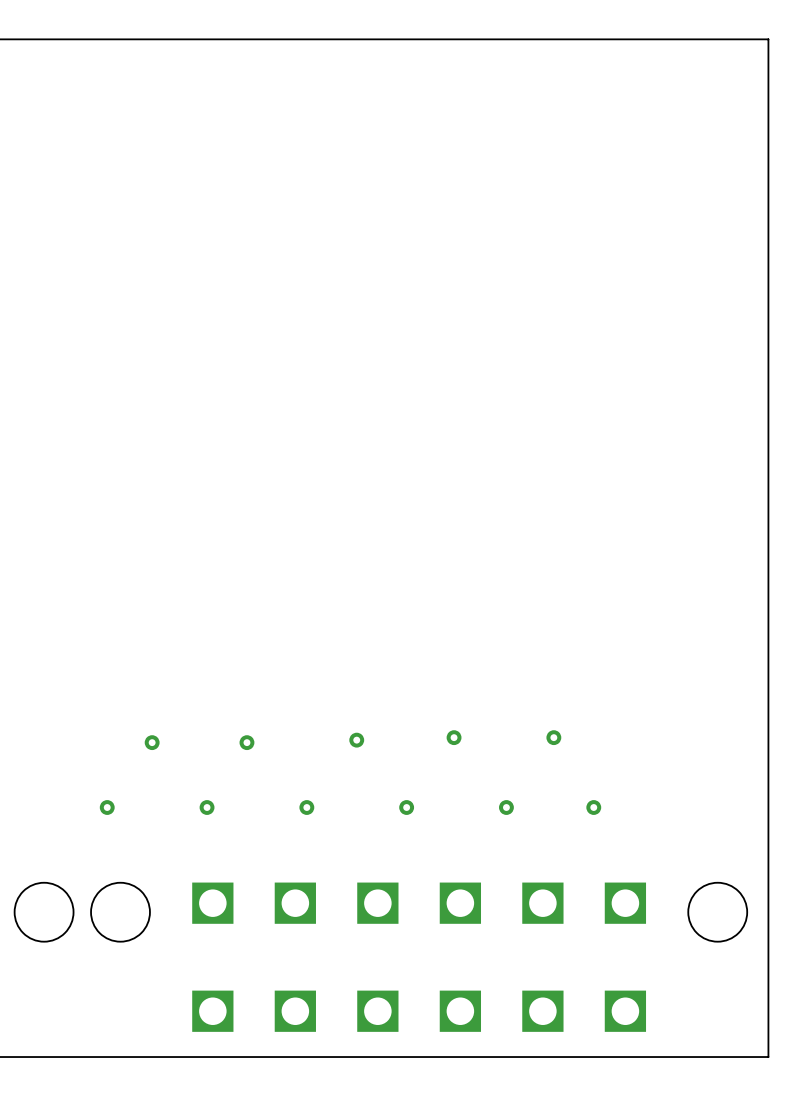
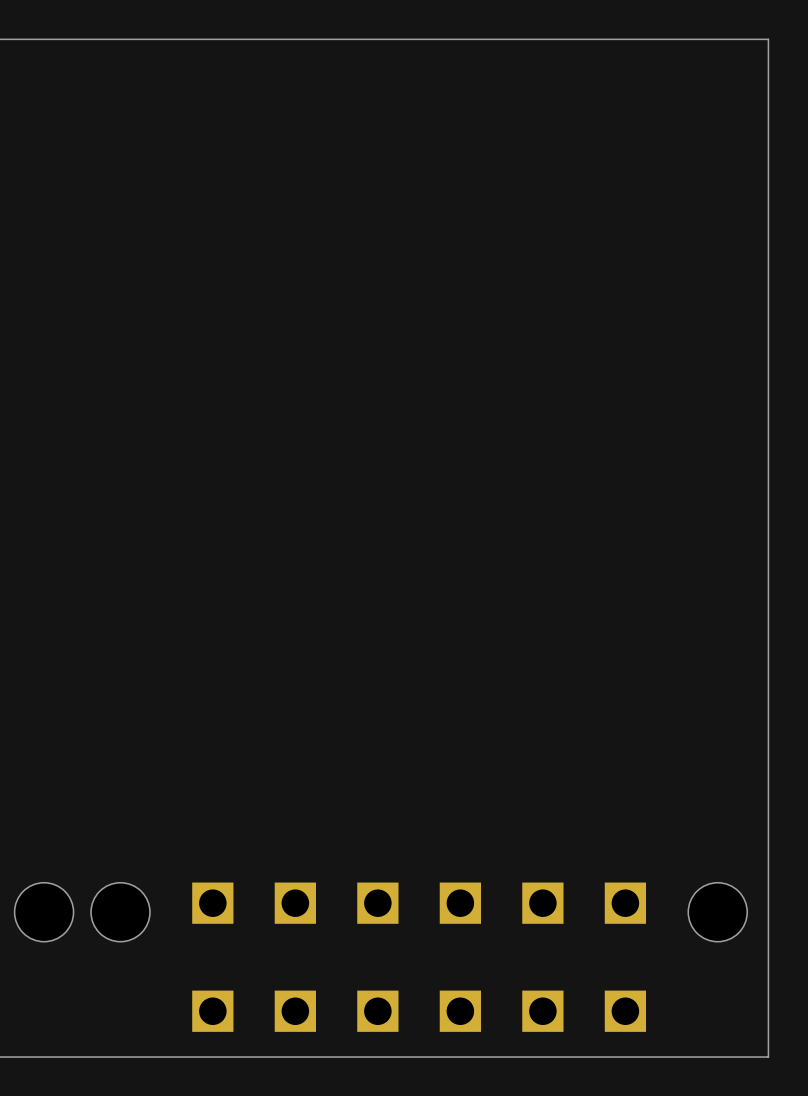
via: (454, 737) -> none
via: (553, 737) -> none
via: (356, 740) -> none
via: (152, 742) -> none
via: (246, 742) -> none
via: (107, 807) -> none
via: (207, 807) -> none
via: (306, 807) -> none
via: (406, 807) -> none
via: (506, 807) -> none
via: (593, 807) -> none

